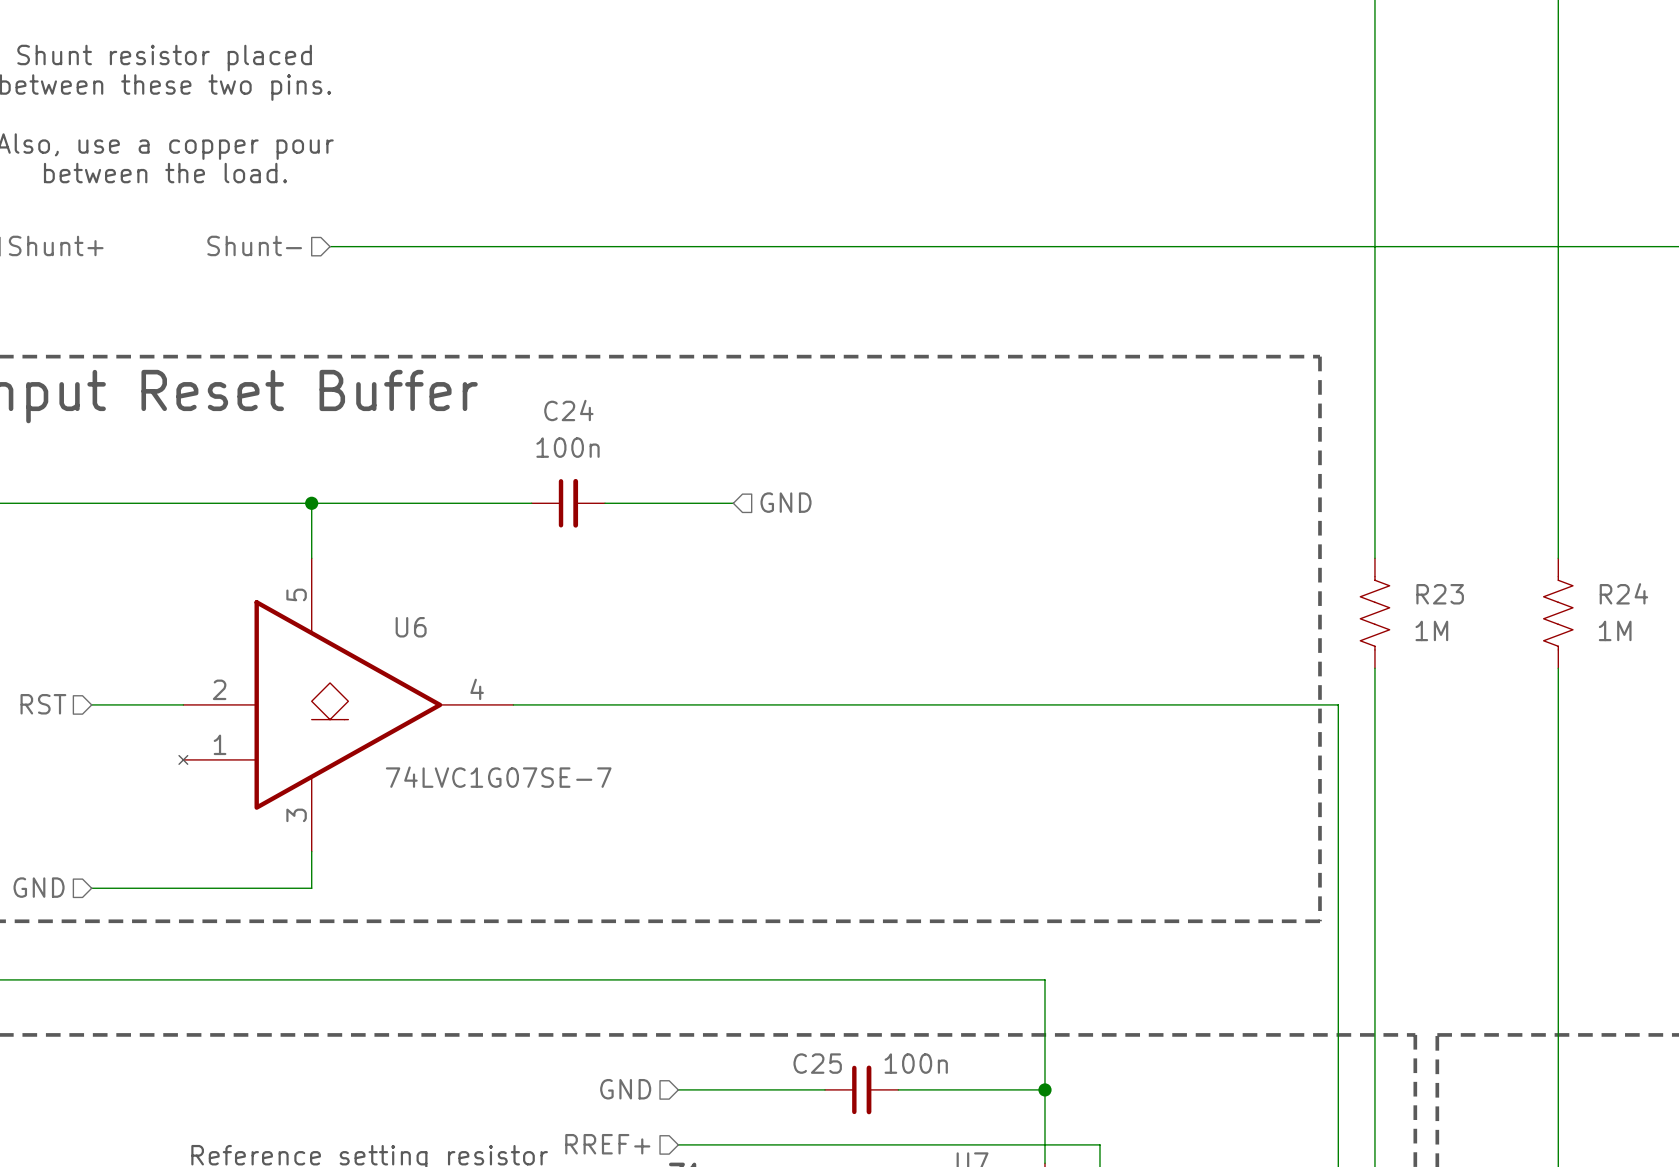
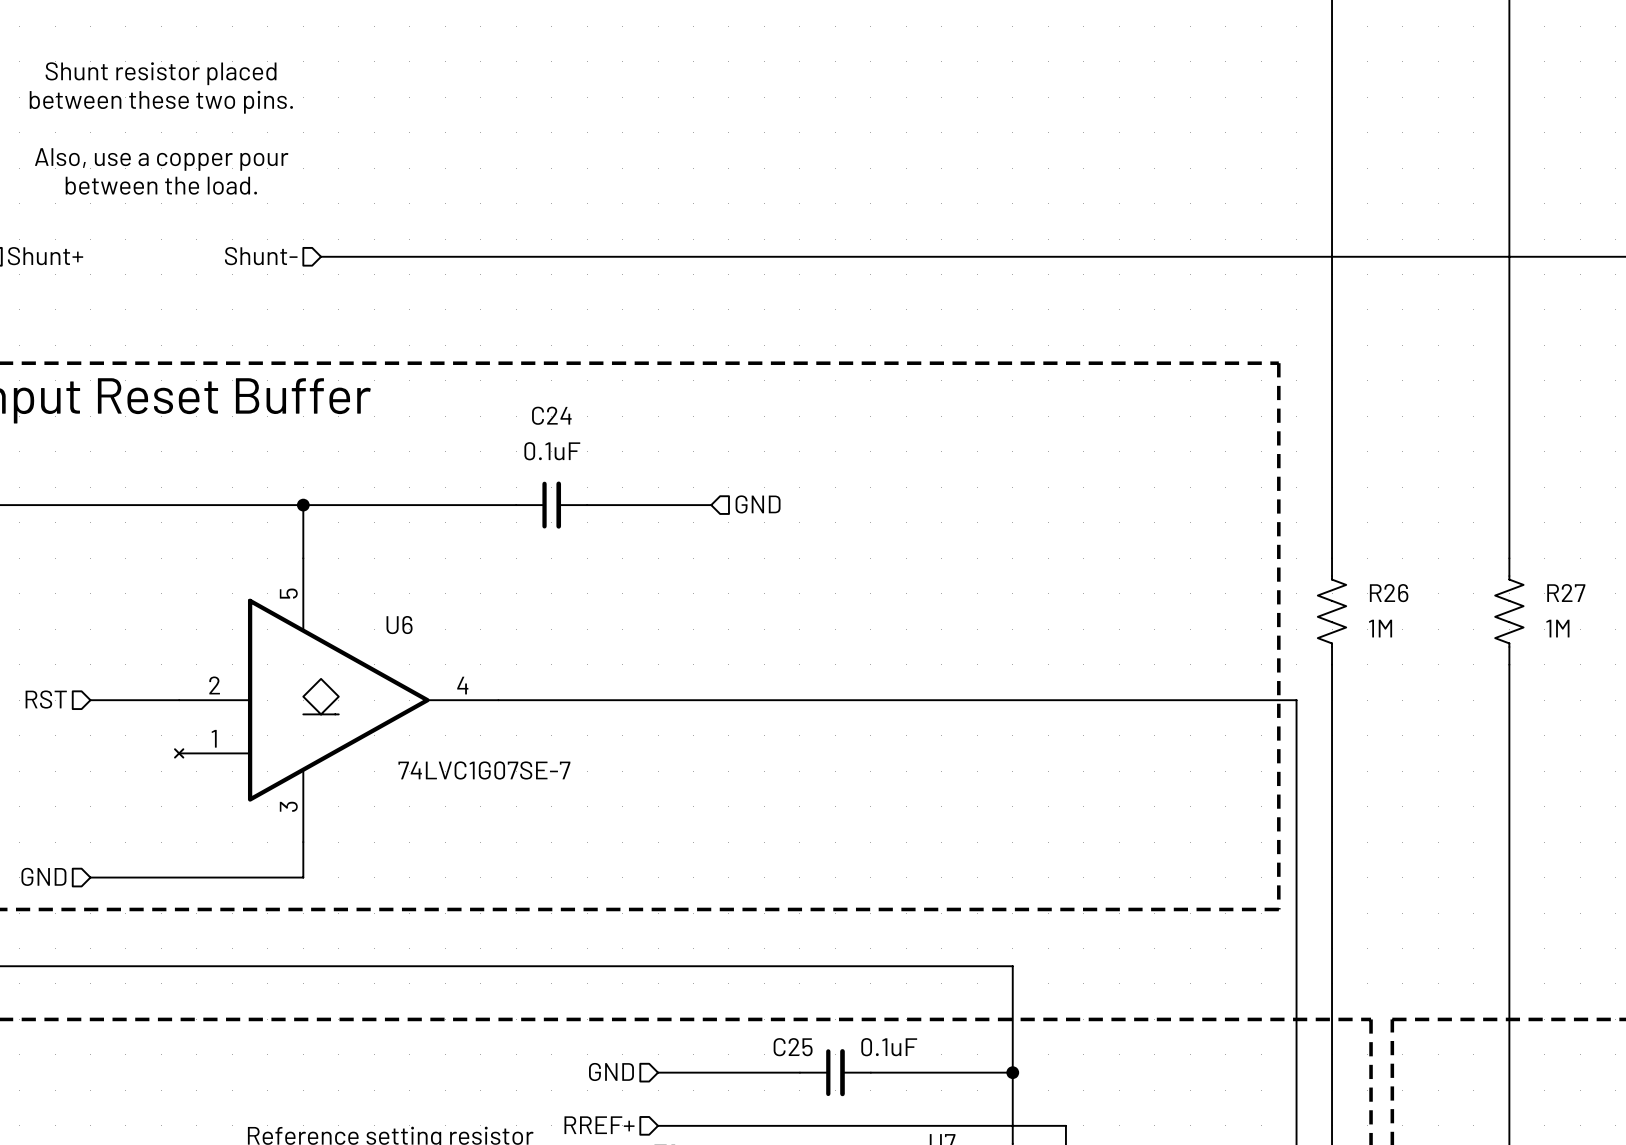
C24 value: 100n (568, 447) -> 0.1uF (552, 451)
R24 name: R24 (1623, 593) -> R27 (1566, 593)
R23 name: R23 (1440, 594) -> R26 (1389, 593)
C25 value: 100n (916, 1063) -> 0.1uF (889, 1047)

